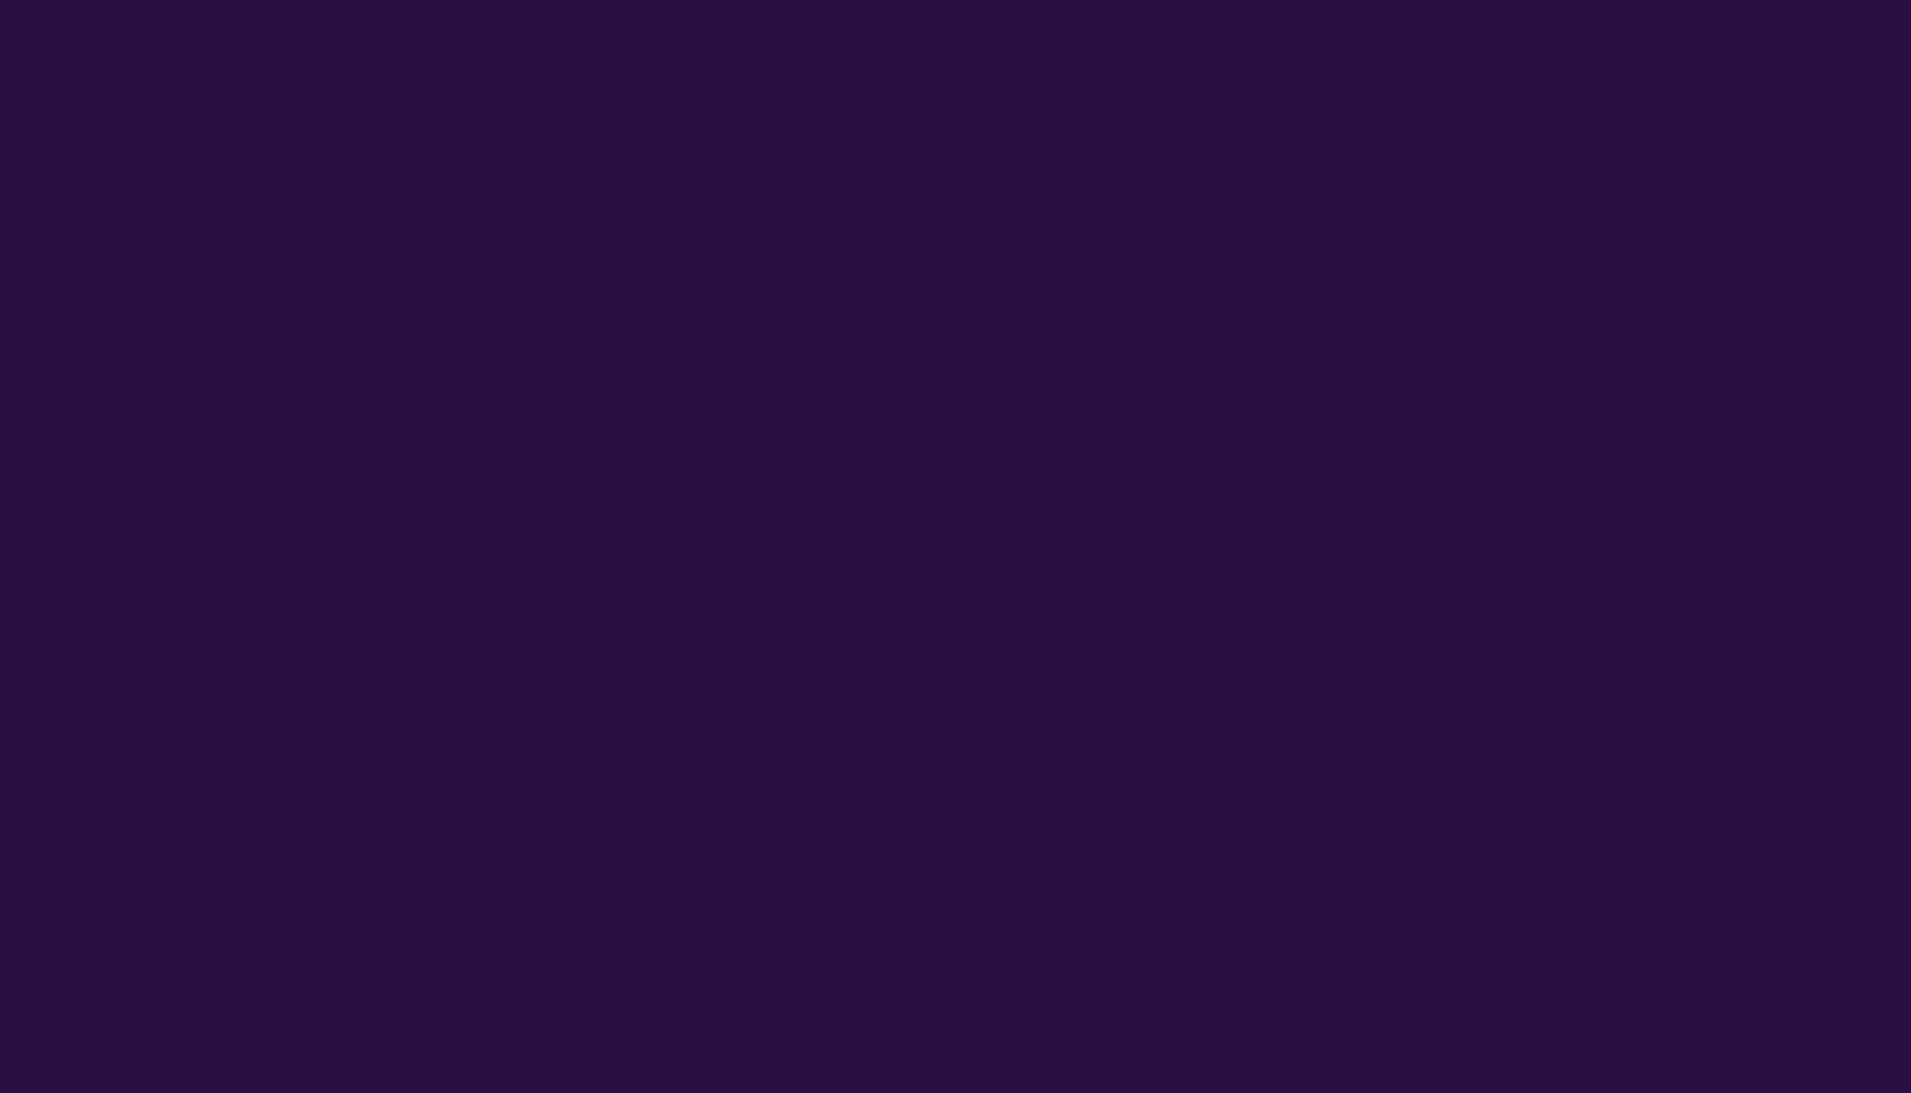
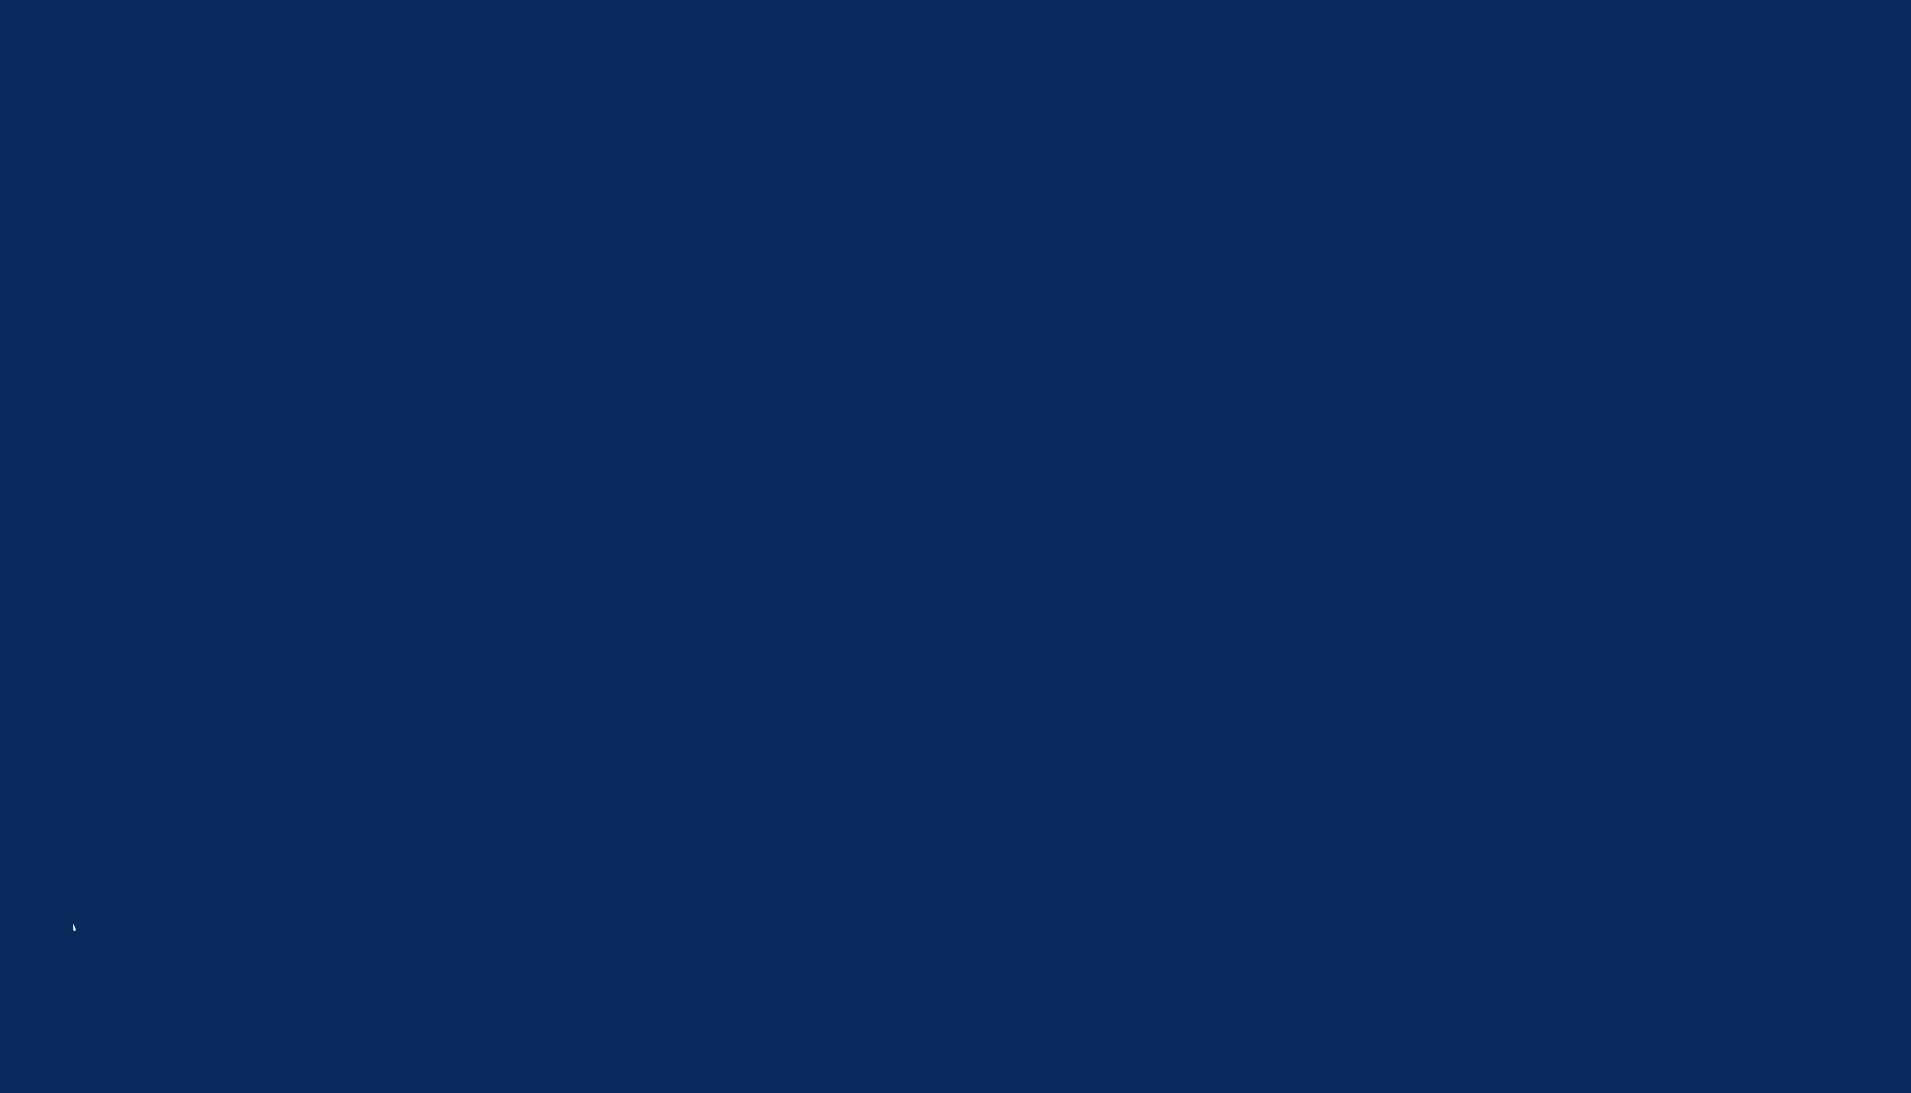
drawing: none -> [72, 923, 76, 931]

